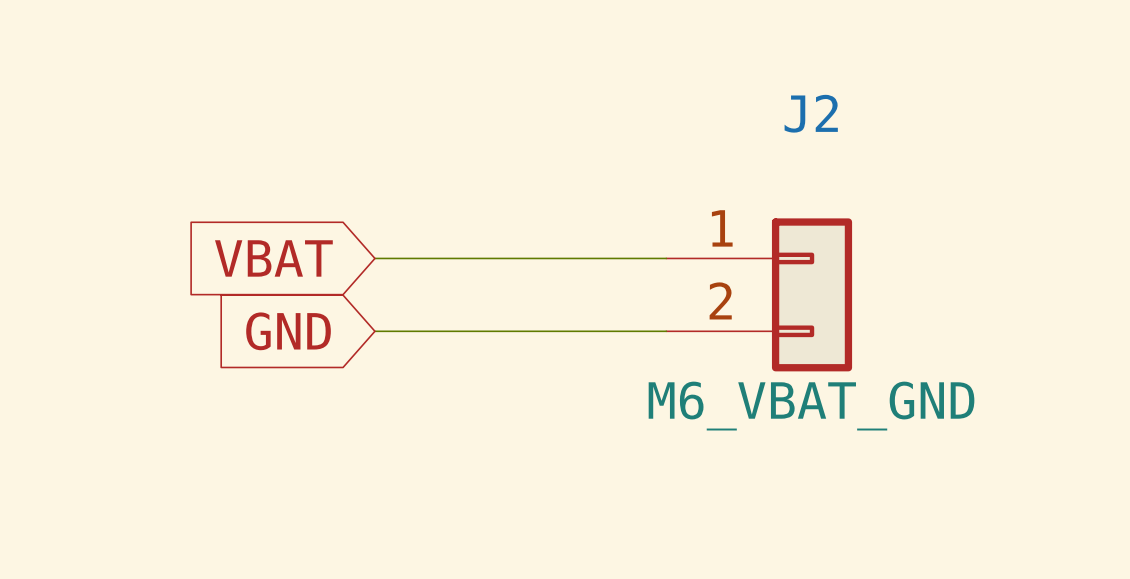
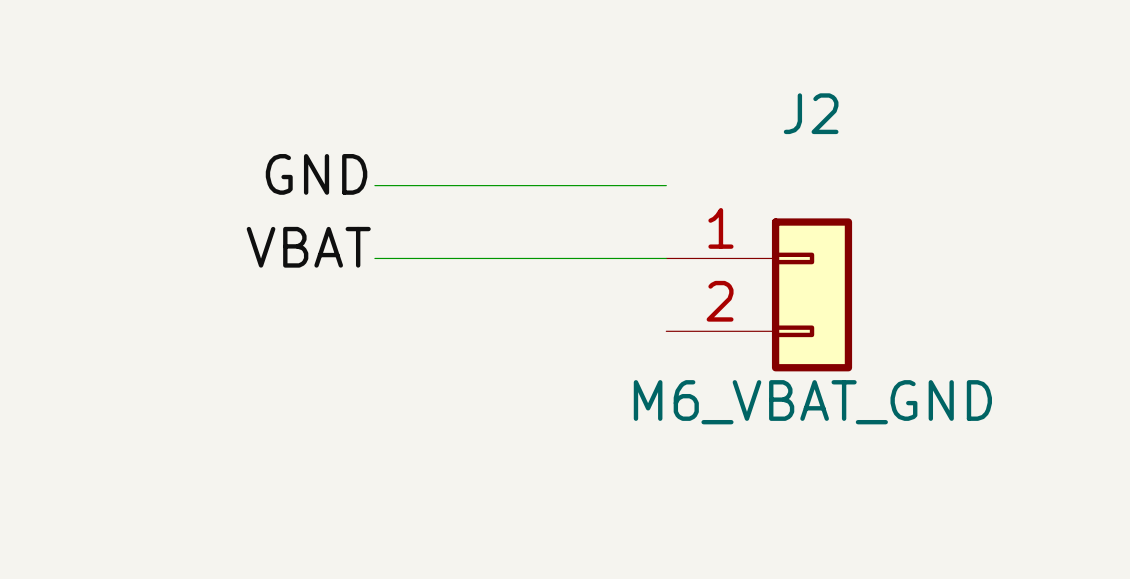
label: none -> GND (316, 174)
label: none -> VBAT (308, 247)
global label: VBAT (273, 258) -> none
global label: GND (288, 331) -> none
wire: (374, 331) (666, 331) -> (374, 185) (666, 185)

